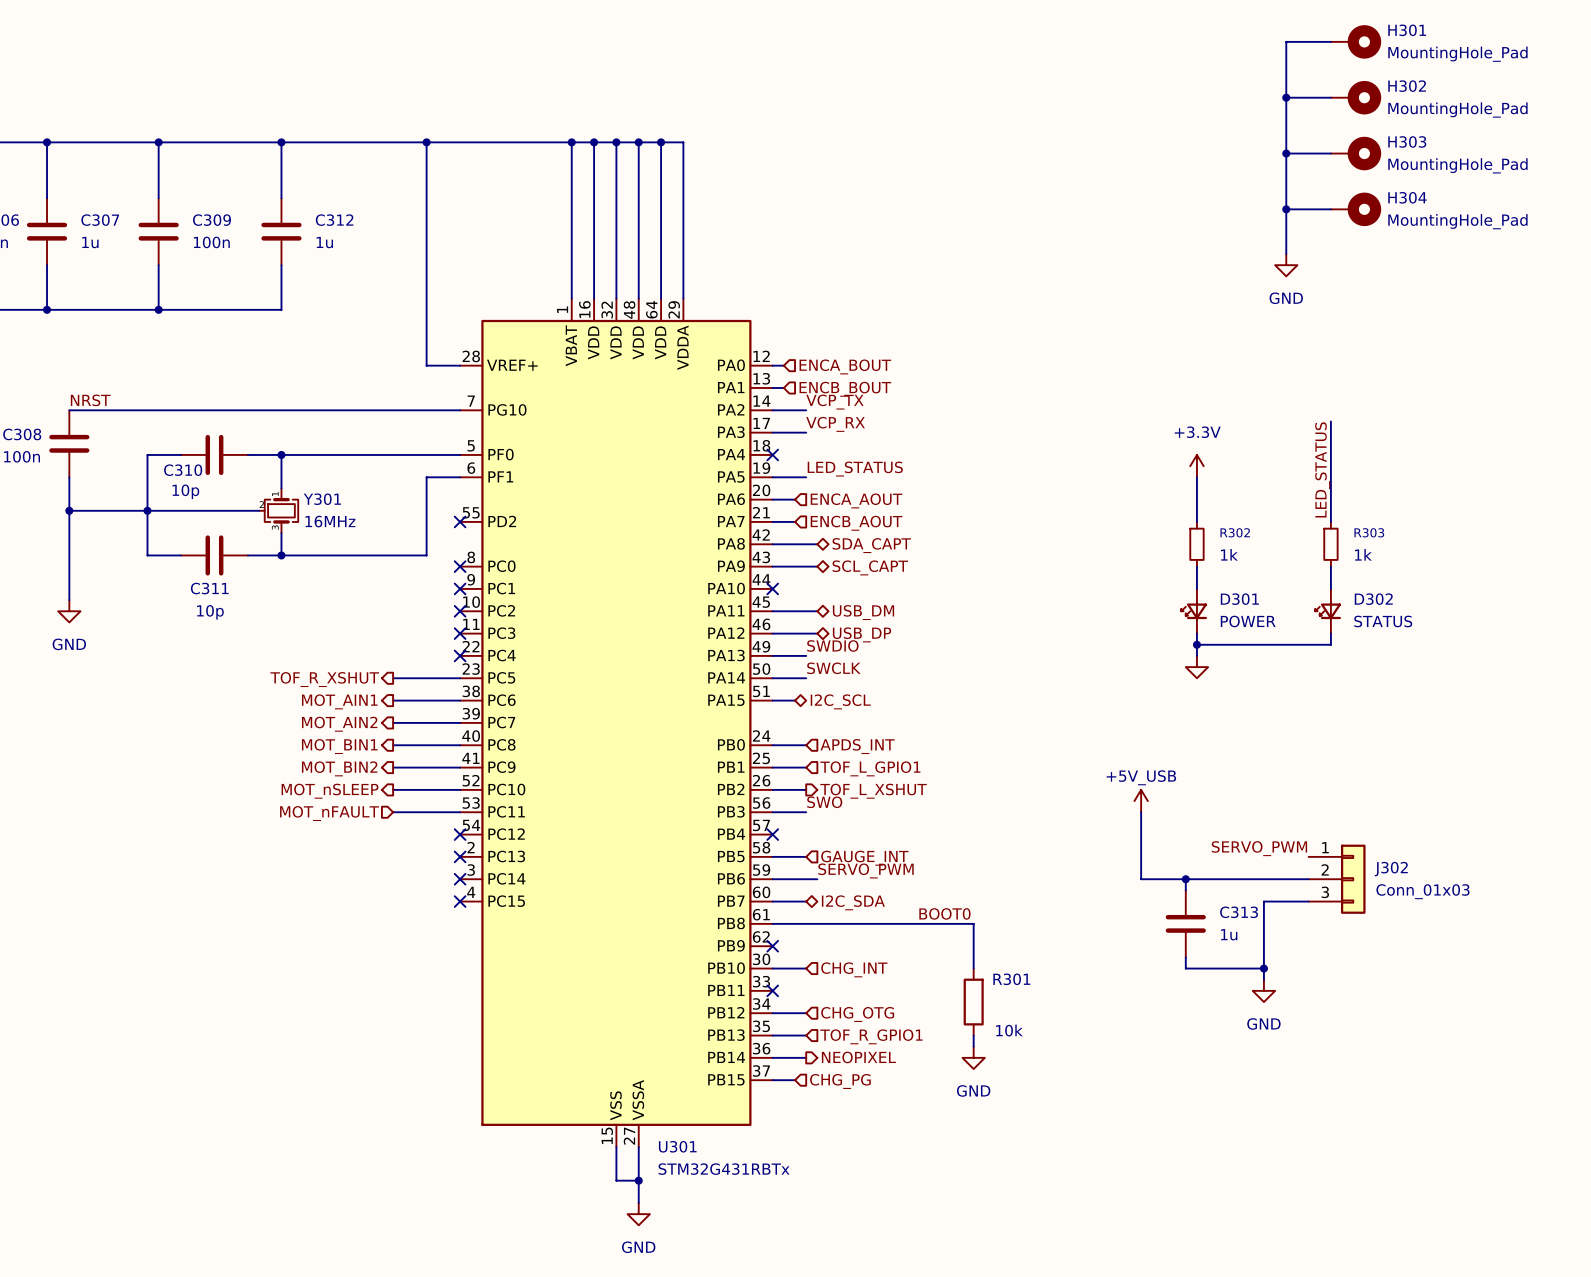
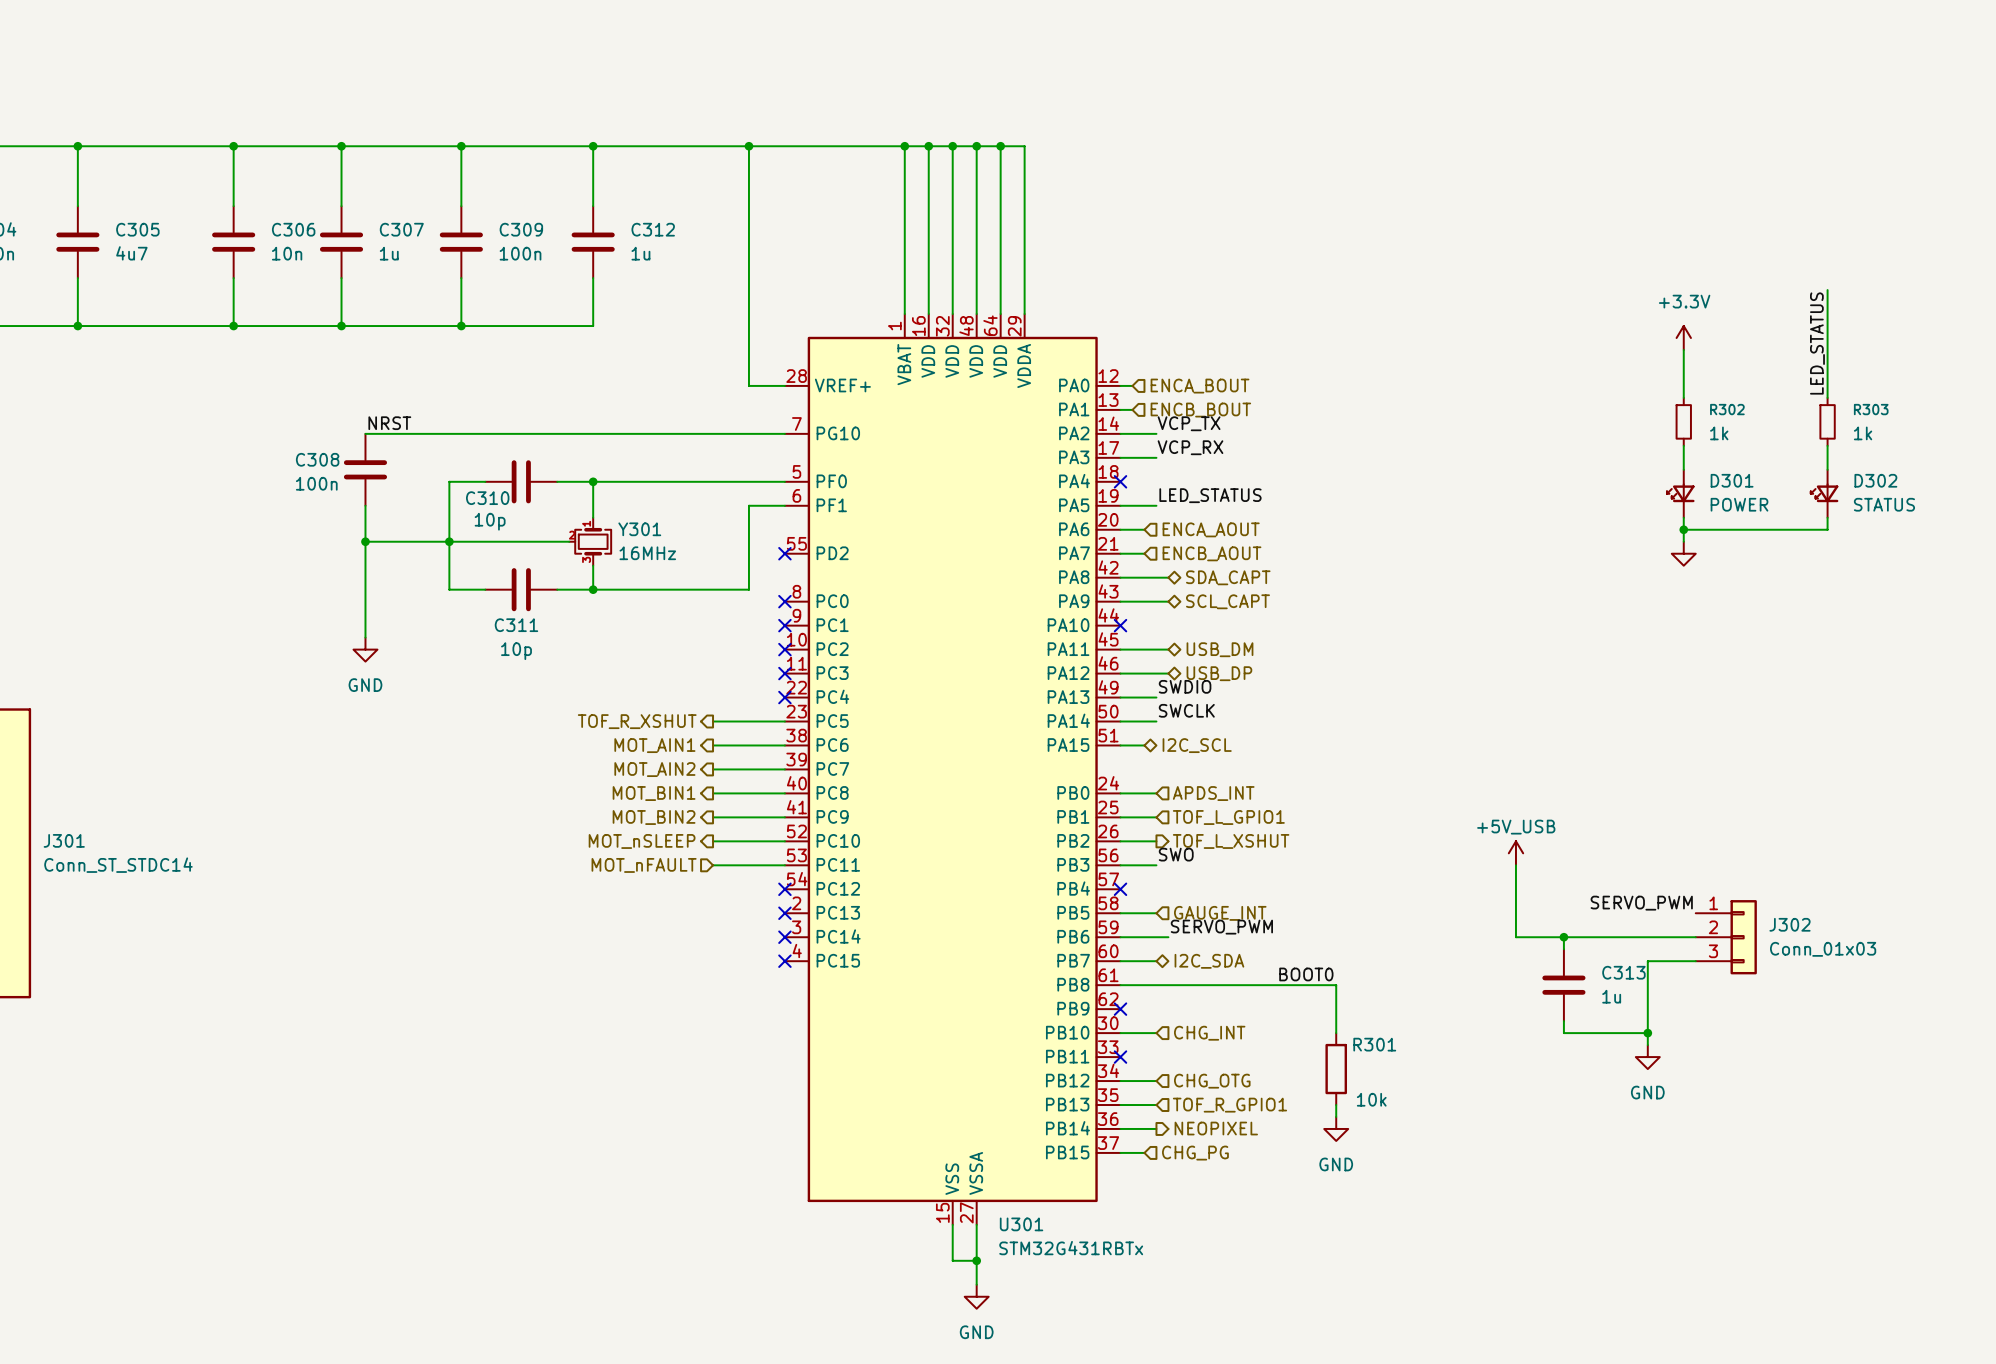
wire: (1330, 41) (1286, 41) (1286, 254) -> none
H301: MountingHole_Pad (1356, 41) -> none
wire: (1286, 97) (1330, 97) -> none
junction: (1286, 97) -> none
H302: MountingHole_Pad (1356, 97) -> none
wire: (1286, 153) (1330, 153) -> none
junction: (1286, 153) -> none
H303: MountingHole_Pad (1356, 153) -> none
wire: (1286, 209) (1330, 209) -> none
junction: (1286, 209) -> none
H304: MountingHole_Pad (1356, 209) -> none
power symbol: GND (1286, 265) -> none
wire: (1330, 421) (1330, 521) -> (1827, 290) (1827, 397)
power symbol position: +3.3V (1196, 466) -> +3.3V (1683, 338)
label position: LED_STATUS (1322, 469) -> LED_STATUS (1817, 343)
wire: (1196, 477) (1196, 521) -> (1683, 349) (1683, 397)
junction: none -> (1683, 529)
R302 position: (1196, 544) -> (1683, 421)
R303 position: (1330, 544) -> (1827, 421)
wire: (1196, 566) (1196, 588) -> (1683, 445) (1683, 469)
wire: (1330, 566) (1330, 588) -> (1827, 445) (1827, 469)
D301 position: (1194, 611) -> (1680, 493)
D302 position: (1328, 611) -> (1824, 493)
wire: (1196, 633) (1196, 655) -> (1683, 517) (1683, 541)
wire: (1330, 633) (1330, 644) (1196, 644) -> (1827, 517) (1827, 529) (1683, 529)
junction: (1196, 644) -> none
power symbol position: (1196, 667) -> (1683, 553)

